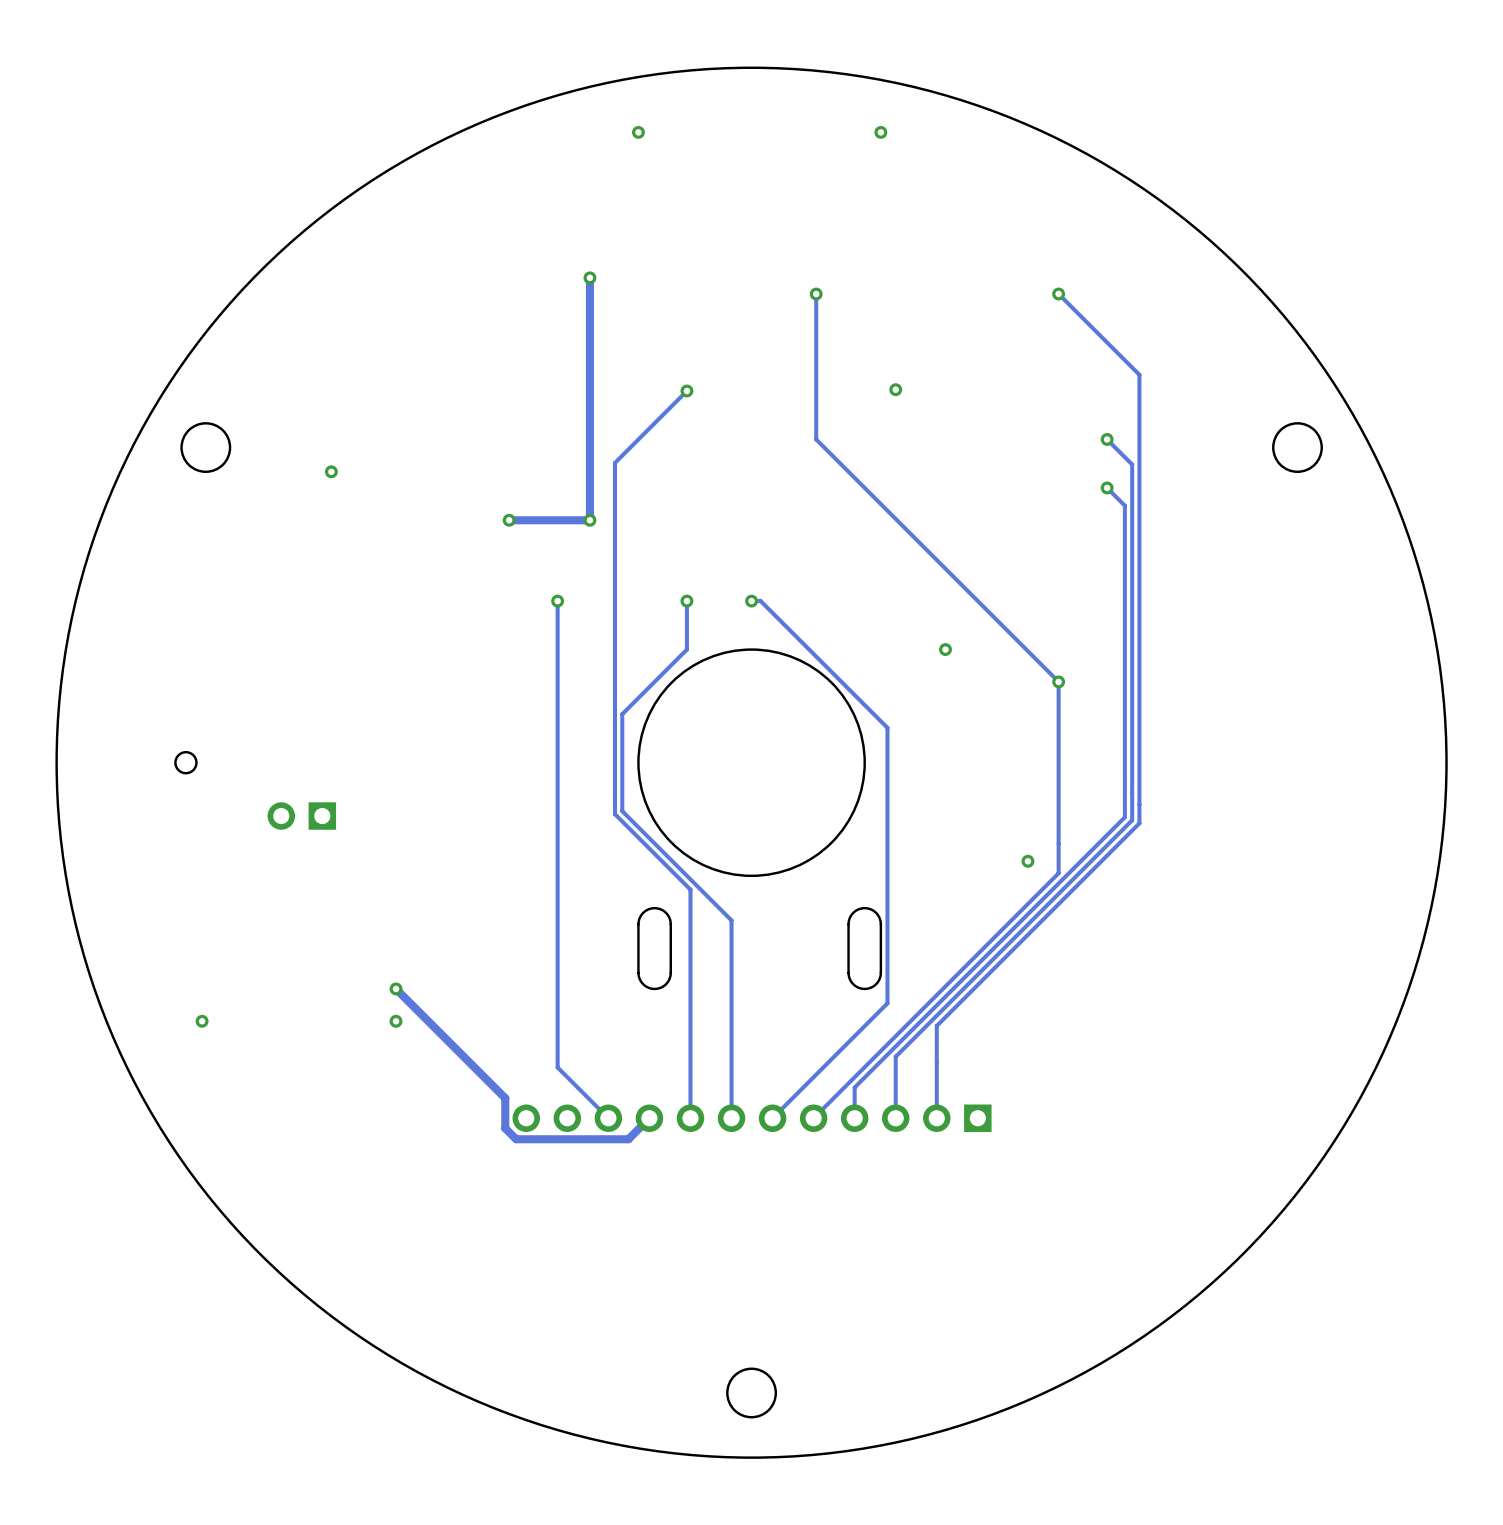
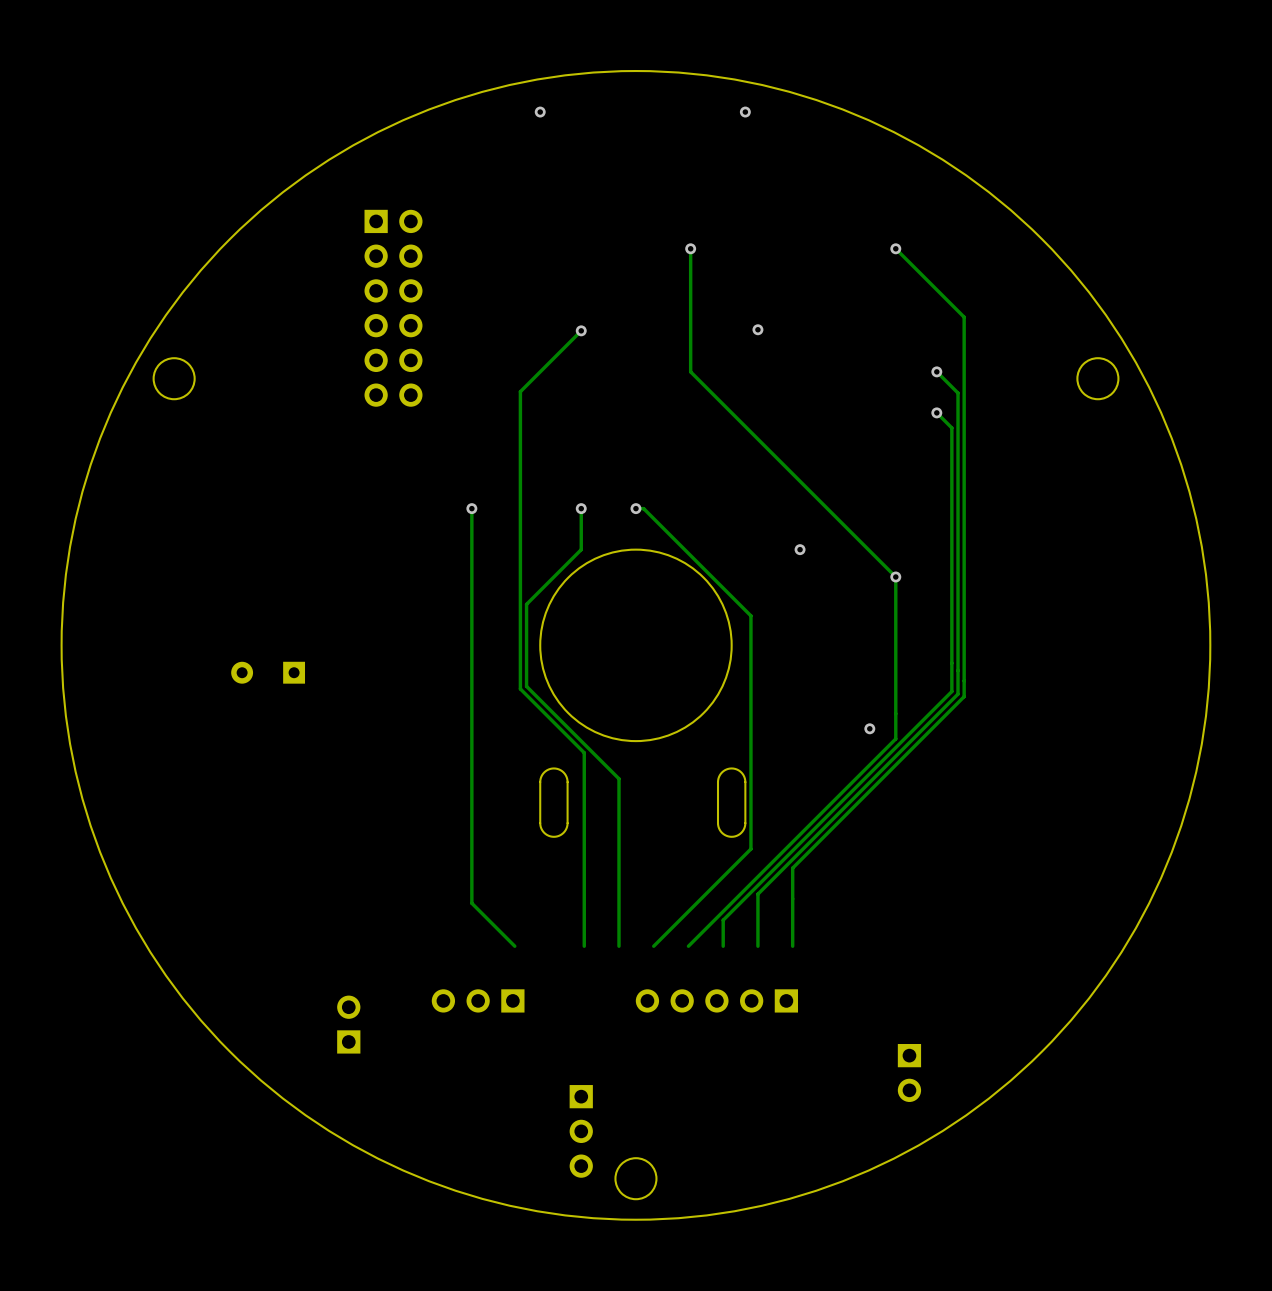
round board edge size: [55, 66, 1448, 1459] -> [60, 69, 1212, 1221]
track: (589, 277) (589, 520) (509, 520) -> none
via: (589, 277) -> none
part: none -> (393, 308)
via: (331, 471) -> none
via: (509, 520) -> none
via: (589, 520) -> none
round board edge: [174, 750, 198, 775] -> none
part: none -> (268, 672)
part: (301, 816) -> none
track: (396, 988) (505, 1098) (505, 1128) (516, 1139) (628, 1139) (649, 1118) -> none
via: (396, 988) -> none
via: (202, 1021) -> none
via: (396, 1021) -> none
part: (752, 1118) -> none
part: none -> (478, 1000)
part: none -> (716, 1000)
part: none -> (348, 1024)
part: none -> (909, 1072)
part: none -> (581, 1131)

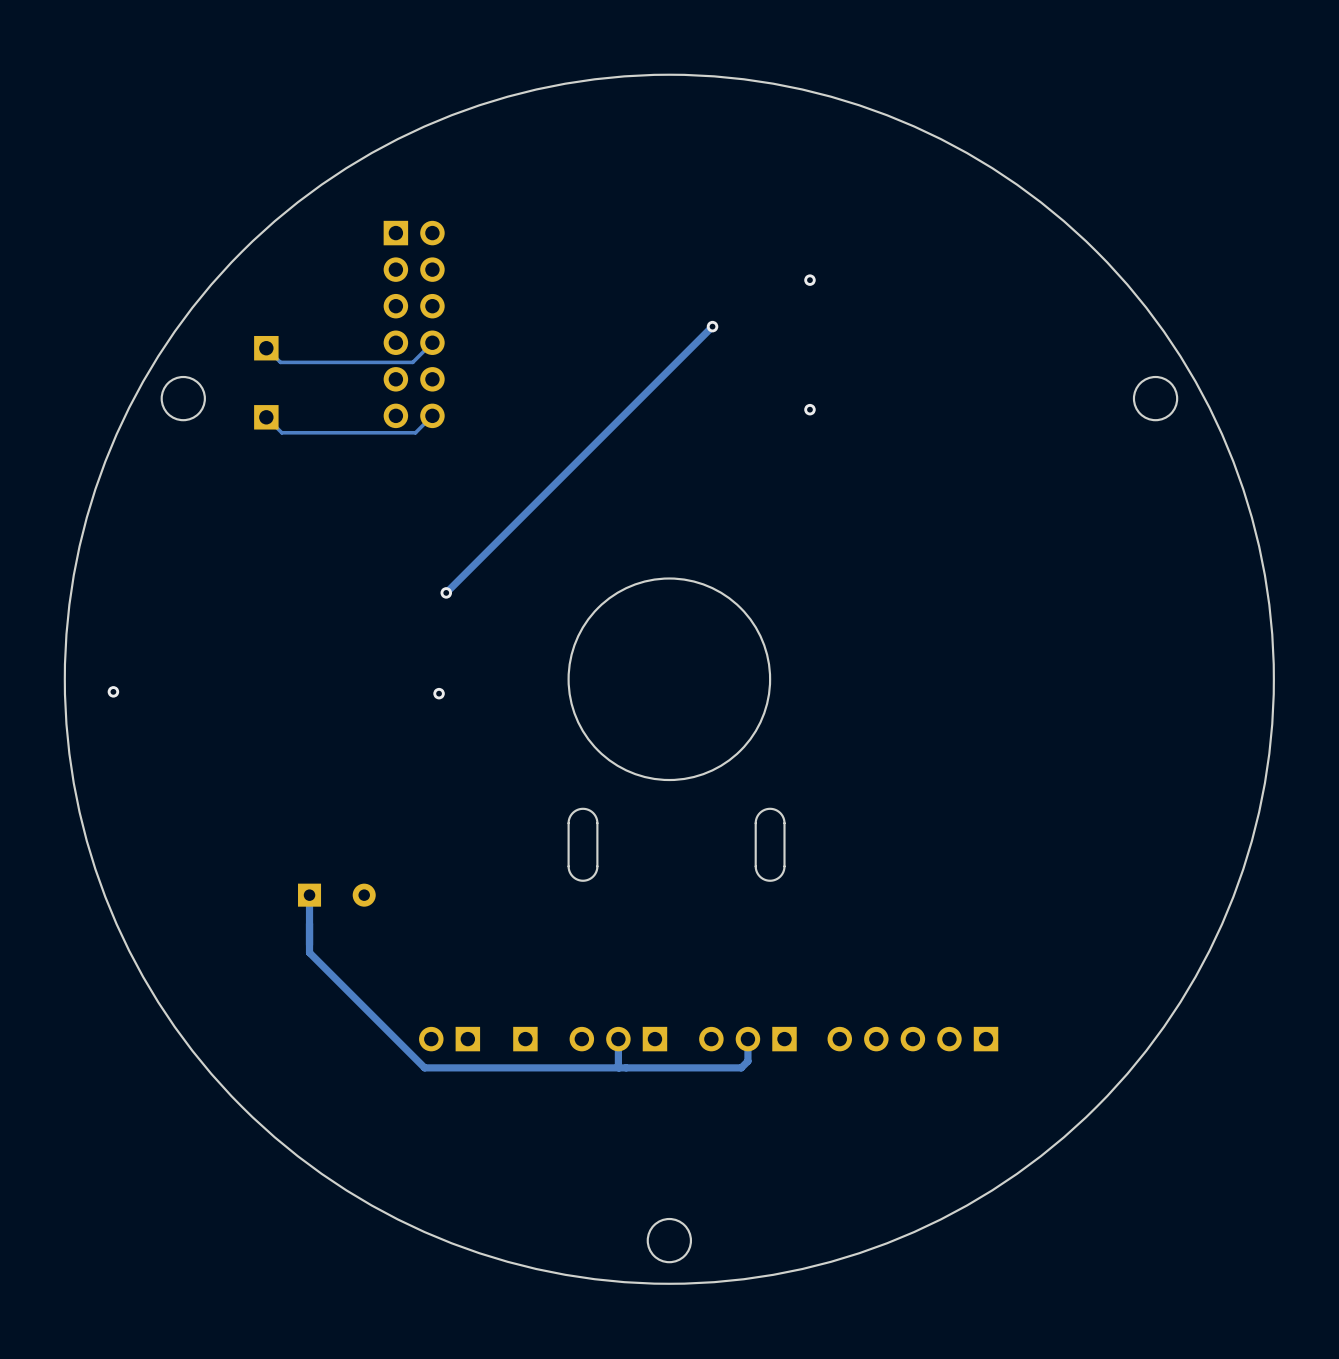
via: (540, 112) -> none
via: (745, 112) -> none
track: (690, 248) (690, 371) (895, 576) (895, 738) (688, 946) -> none
via: (690, 248) -> none
track: (895, 248) (964, 317) (964, 696) (792, 868) (792, 946) -> none
via: (895, 248) -> none
via: none -> (809, 280)
track: none -> (712, 326) (446, 592)
via: none -> (712, 326)
track: none -> (432, 342) (412, 362) (280, 362) (266, 348)
via: (757, 329) -> none
part: none -> (266, 348)
track: (581, 330) (520, 391) (520, 688) (584, 752) (584, 946) -> none
via: (581, 330) -> none
track: (936, 371) (958, 393) (958, 694) (757, 894) (757, 946) -> none
via: (936, 371) -> none
via: none -> (809, 409)
track: none -> (432, 415) (415, 432) (281, 432) (266, 417)
part: none -> (266, 417)
track: (936, 412) (951, 427) (951, 691) (723, 920) (723, 946) -> none
via: (936, 412) -> none
track: (471, 508) (471, 903) (514, 946) -> none
via position: (471, 508) -> (446, 592)
track: (581, 508) (581, 549) (526, 604) (526, 686) (619, 778) (619, 946) -> none
via: (581, 508) -> none
track: (635, 508) (643, 508) (750, 615) (750, 849) (653, 946) -> none
via: (635, 508) -> none
via: (800, 549) -> none
via: (895, 576) -> none
via: none -> (113, 691)
via: none -> (439, 693)
part rotation: 0° (268, 672) -> 180° (336, 895)
part position: (268, 672) -> (336, 895)
via: (869, 728) -> none
track: none -> (309, 895) (309, 952) (424, 1067) (741, 1067) (747, 1061) (747, 1039)
part: none -> (525, 1039)
track: none -> (618, 1039) (618, 1067)
part: none -> (618, 1039)
part: none -> (747, 1039)
part: (478, 1000) -> none
part position: (716, 1000) -> (912, 1039)
part rotation: 0° (348, 1024) -> 90° counterclockwise (449, 1039)
part position: (348, 1024) -> (449, 1039)
part: (909, 1072) -> none
part: (581, 1131) -> none

